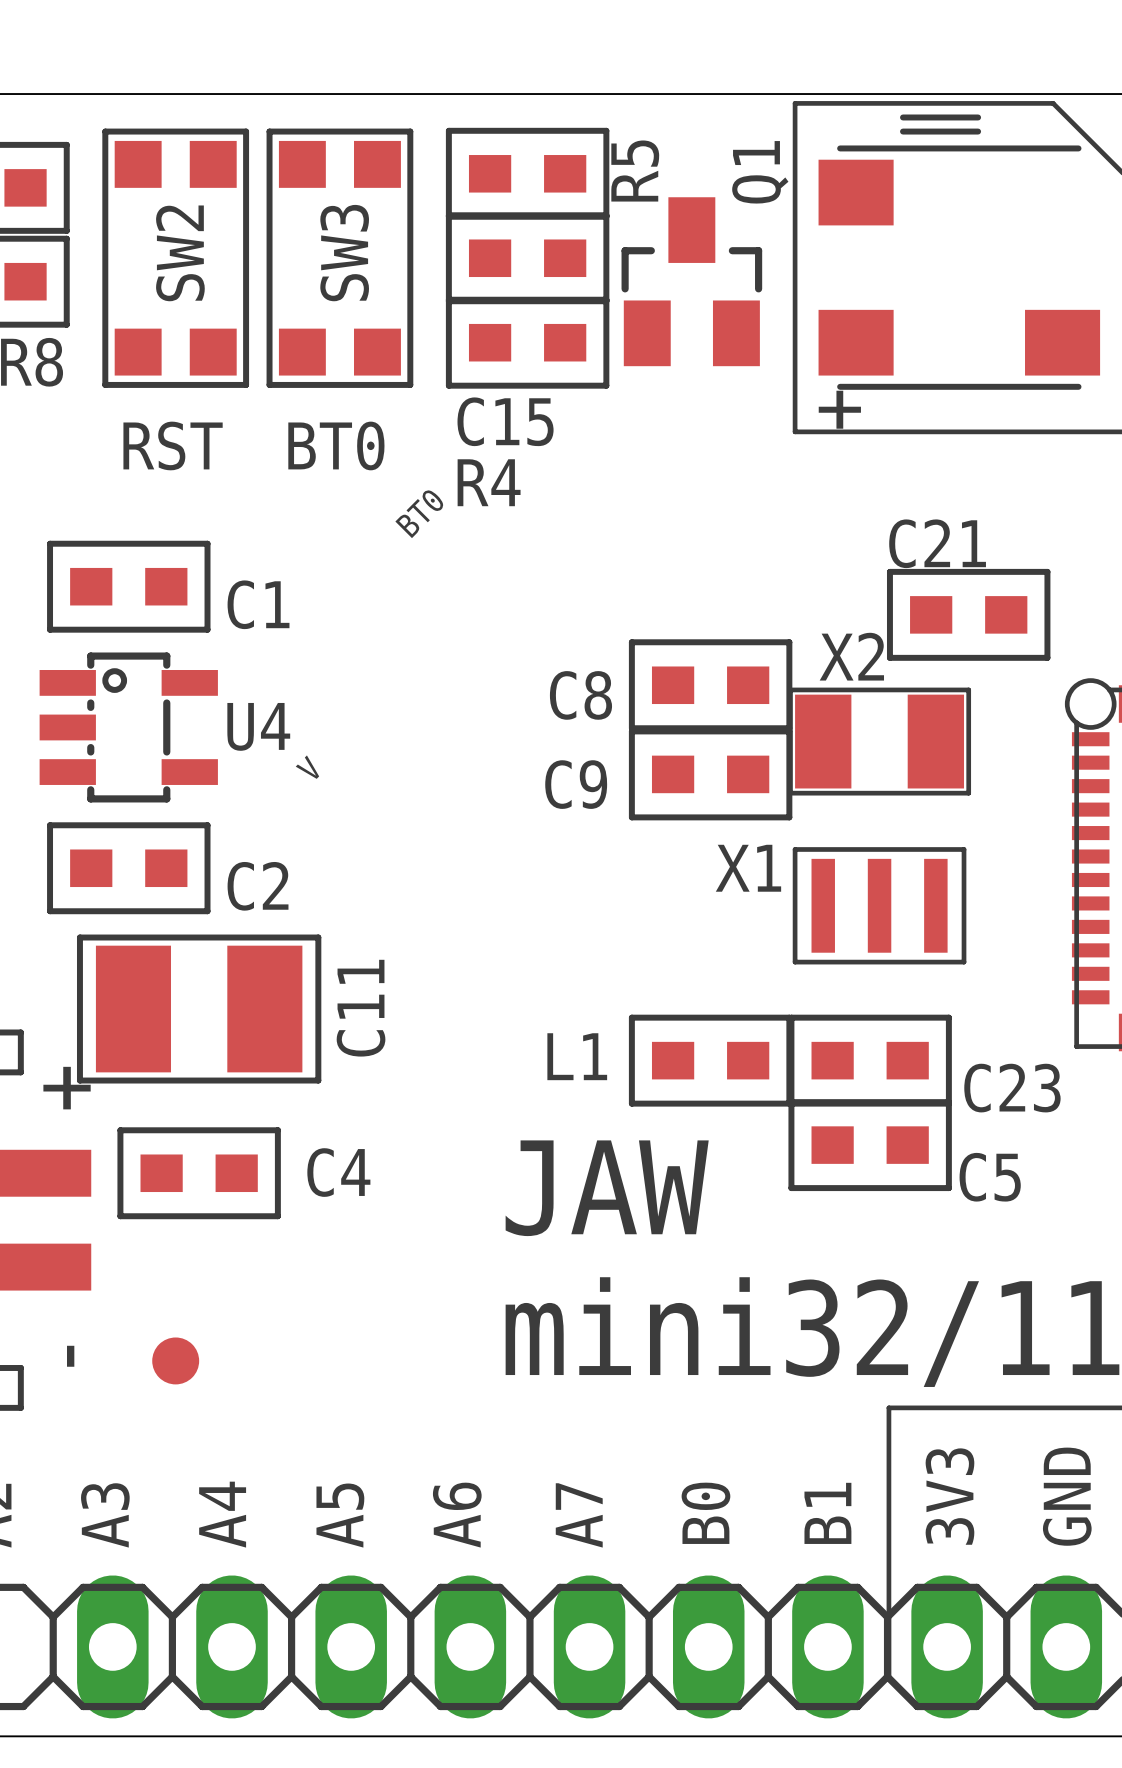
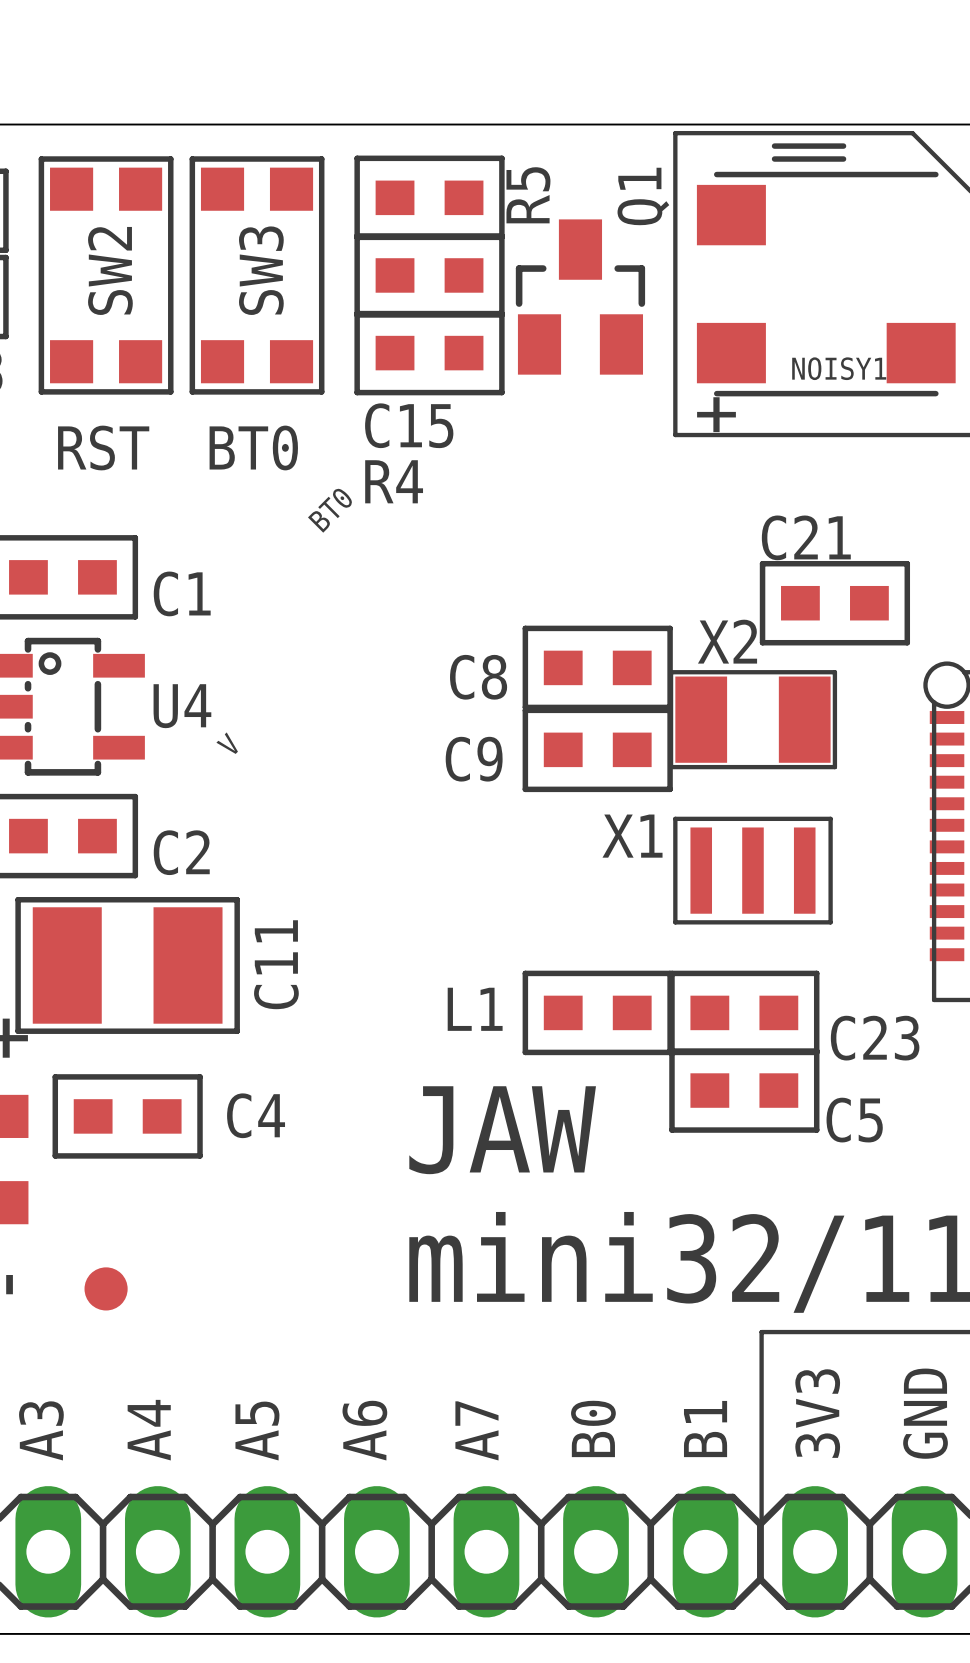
NOISY1 name: none -> NOISY1 (839, 368)

